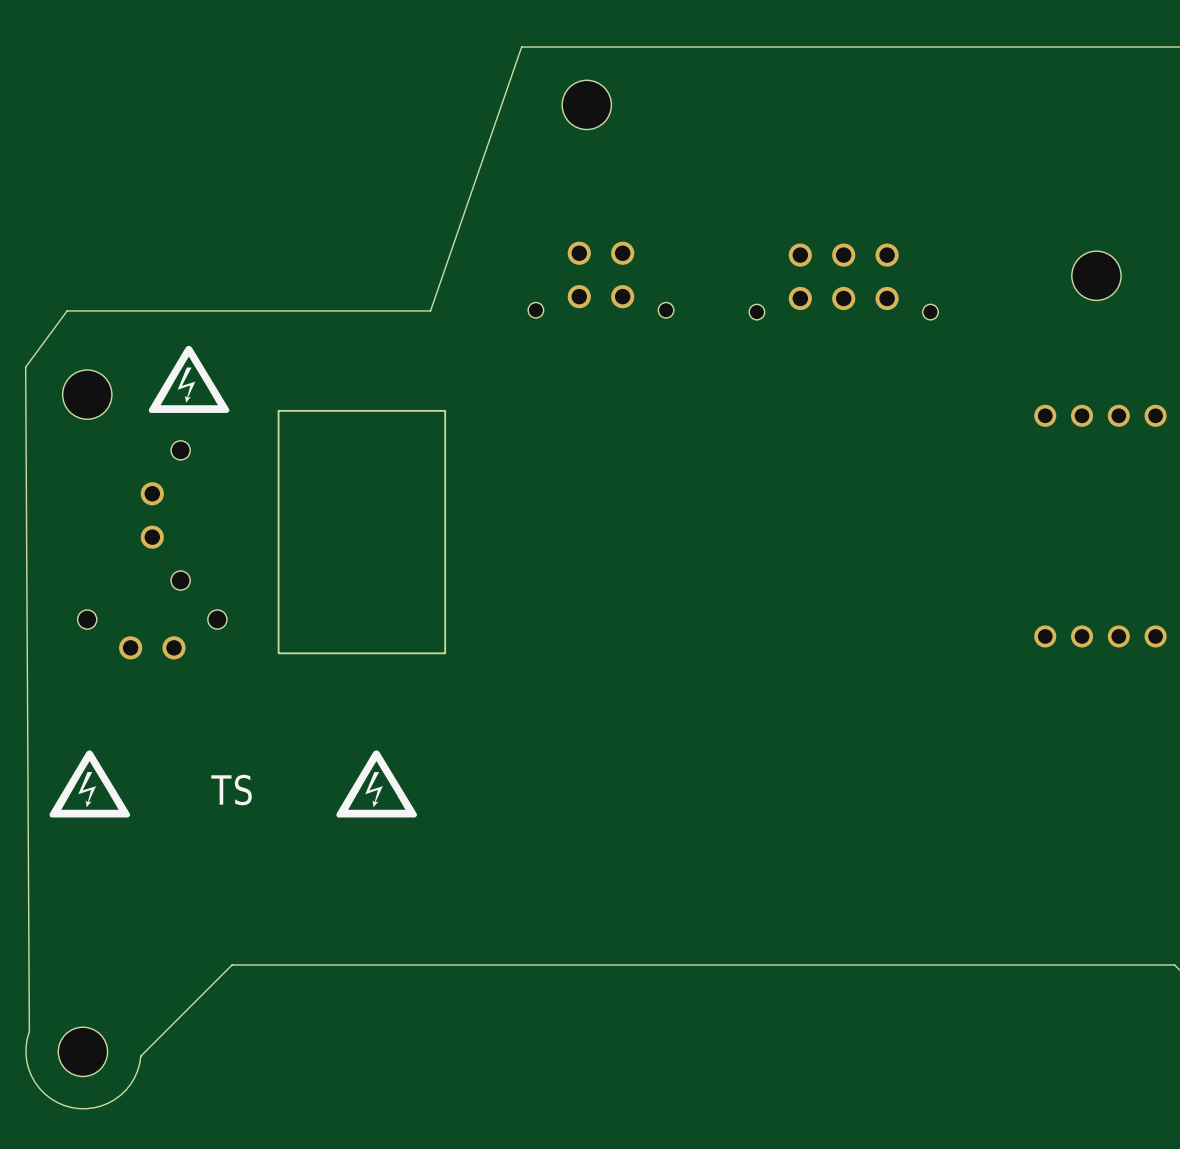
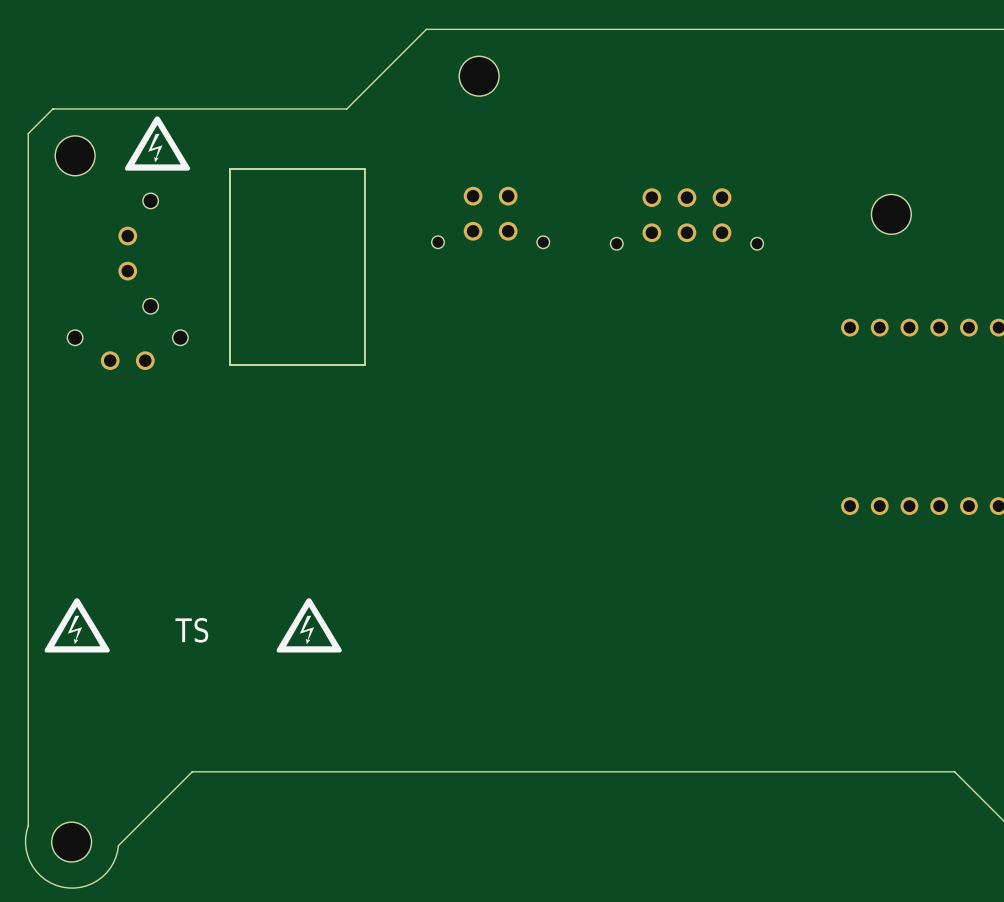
board edge: (521, 47) (430, 310) (67, 310) (25, 367) (29, 1031) -> (426, 29) (346, 108) (52, 108) (28, 133) (28, 825)
part: none -> (138, 253)
drawing position: (189, 379) -> (157, 143)
part position: (87, 394) -> (75, 155)
part rotation: 0° (165, 515) -> 90° counterclockwise (127, 350)
part position: (361, 532) -> (297, 266)
part: (152, 634) -> none

